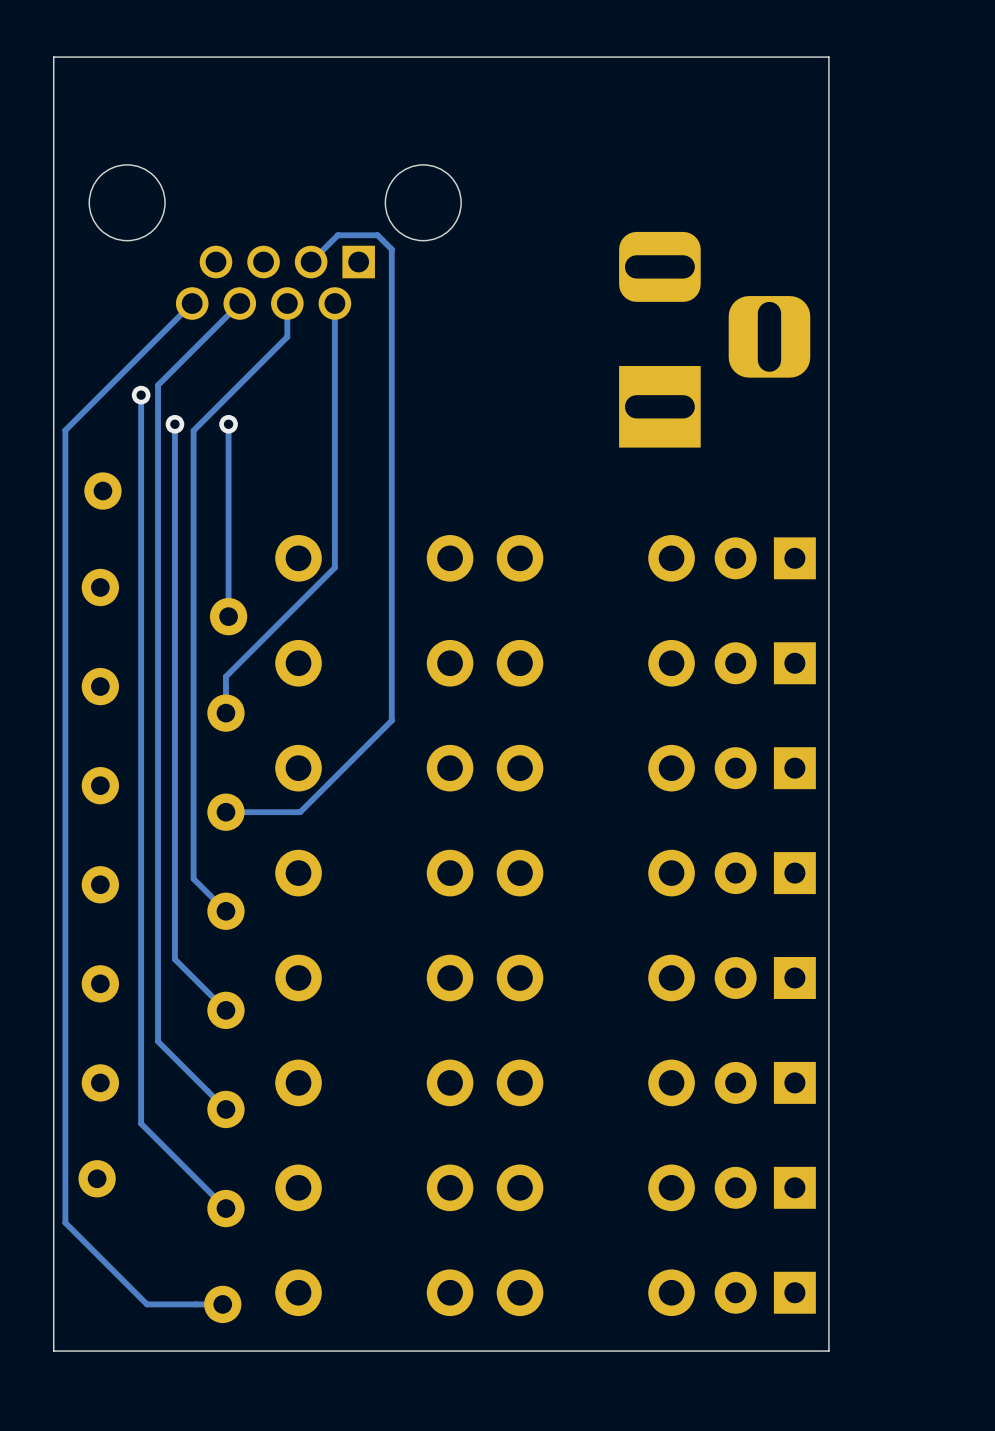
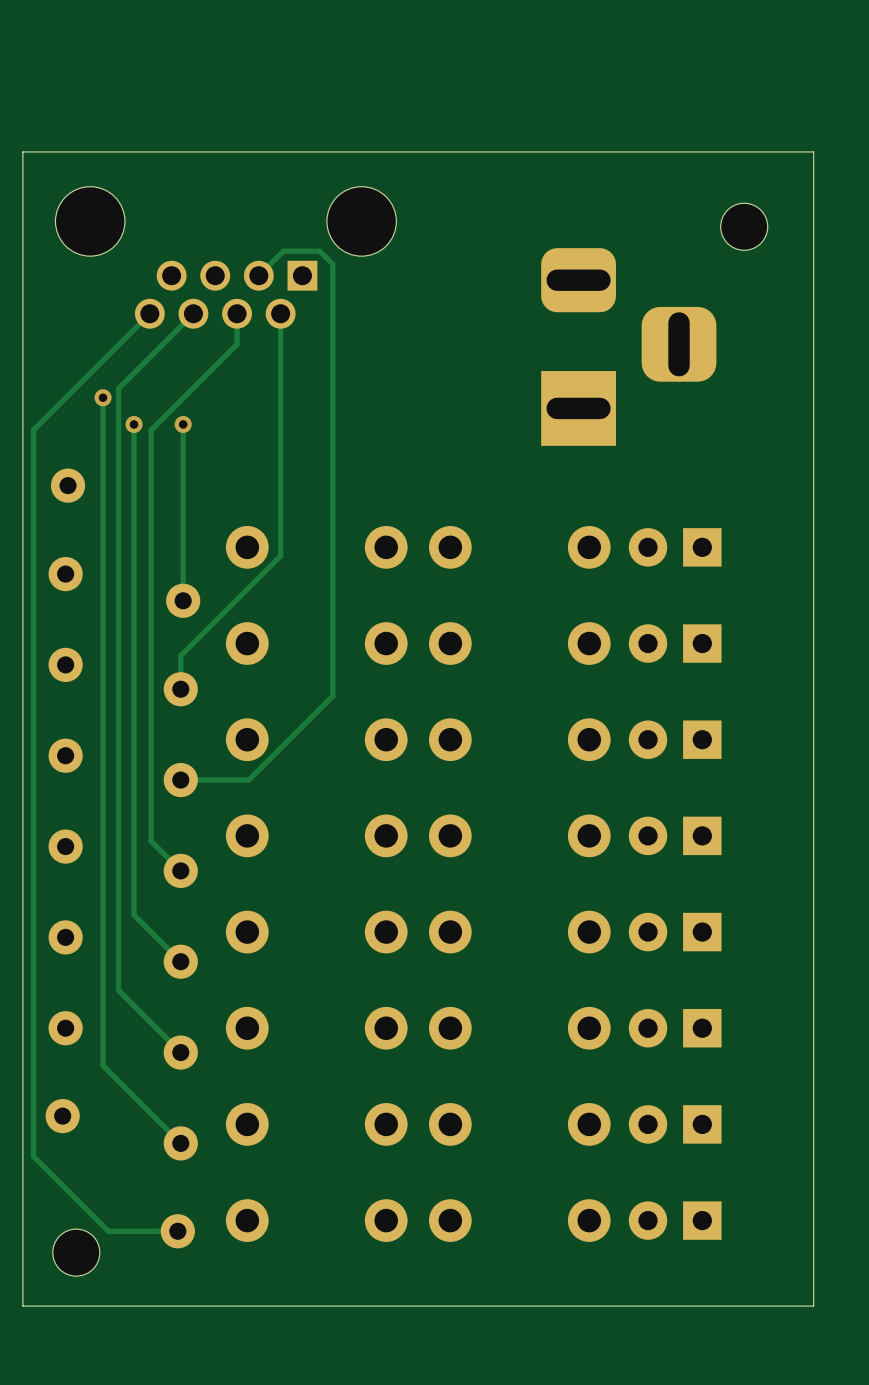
board edge: (53, 127) (53, 57) (828, 57) (828, 1351) (53, 1351) -> (22, 151) (813, 151) (813, 1306) (22, 1306) (22, 1274)
part: none -> (744, 226)
part: none -> (76, 1252)

